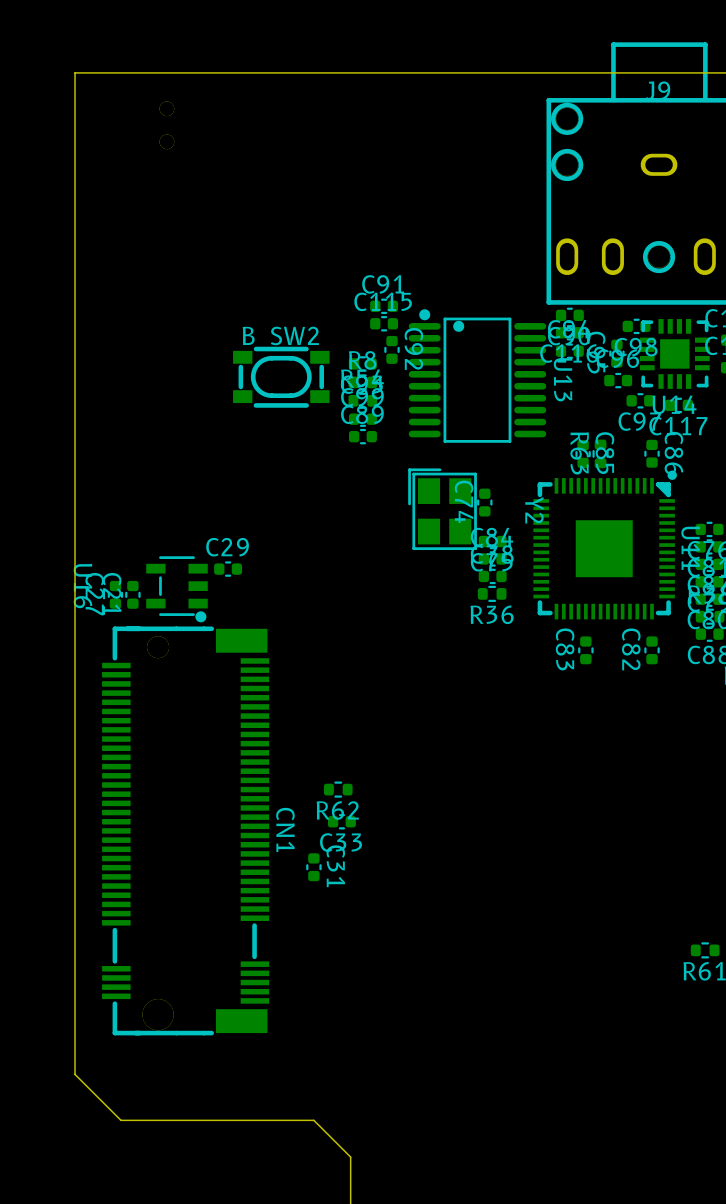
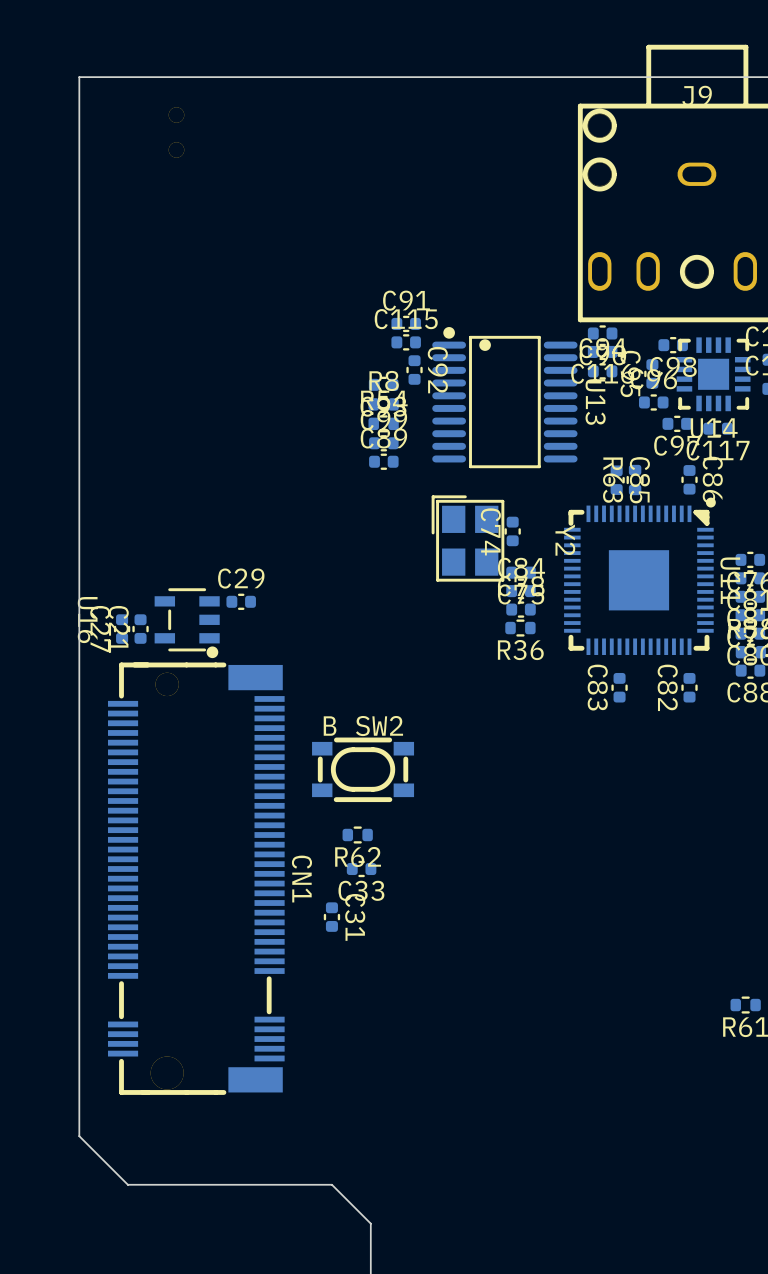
B_SW2 position: (281, 377) -> (363, 769)

